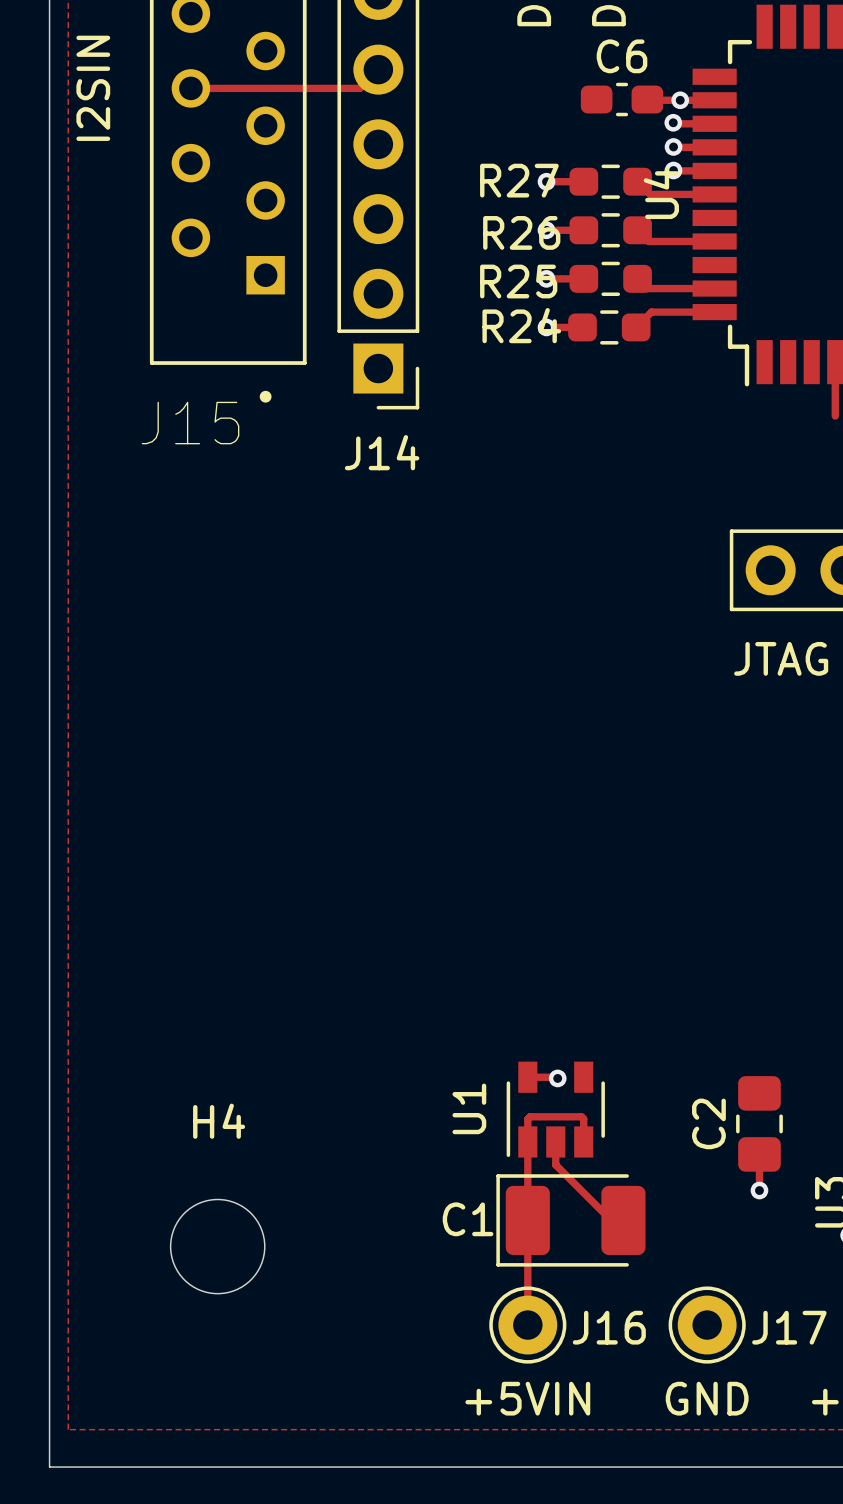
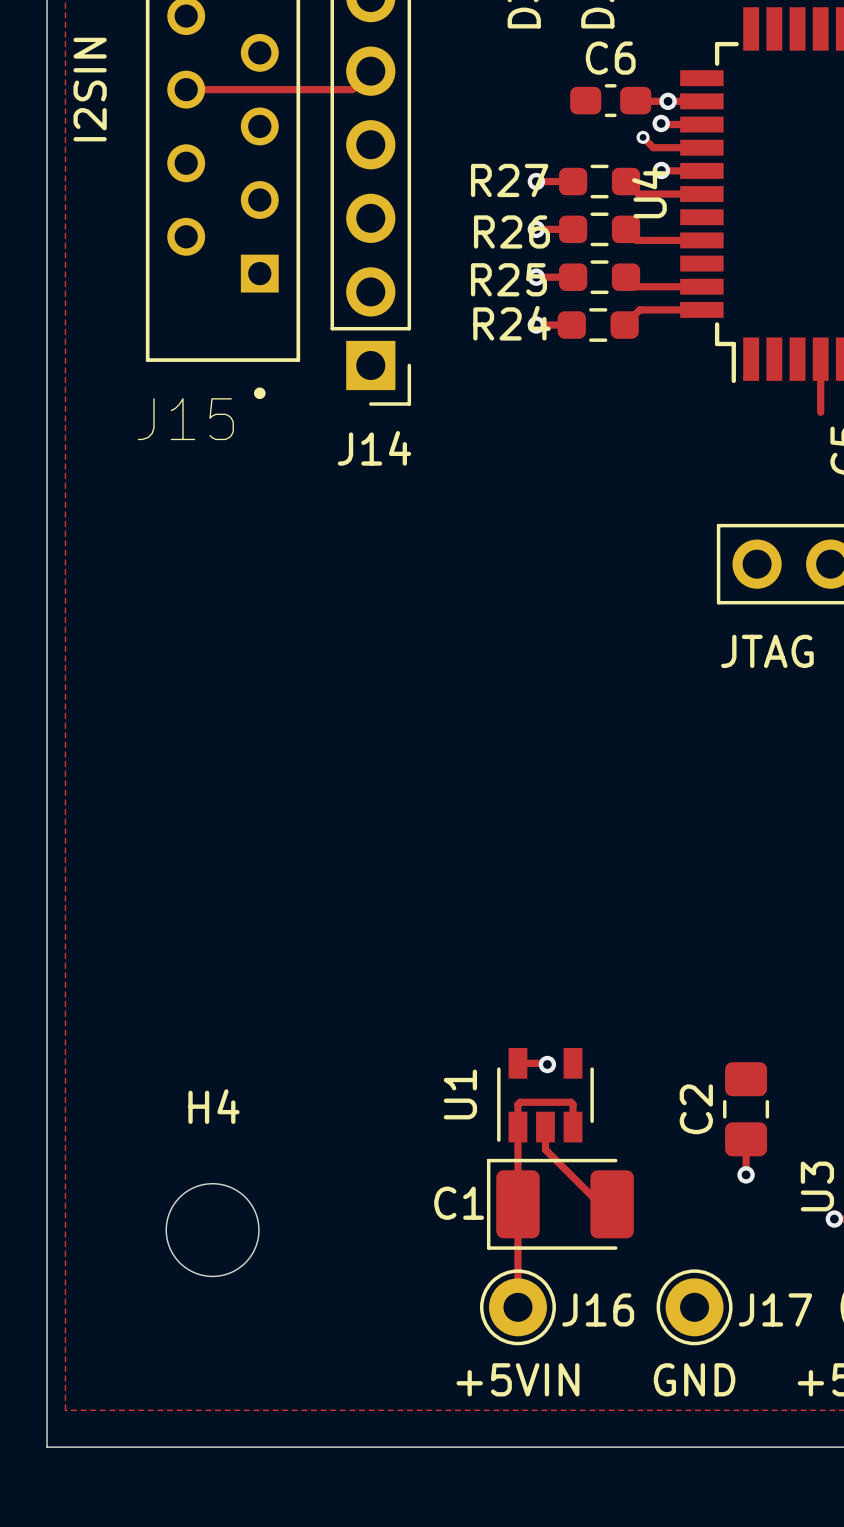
track: none -> (643, 137) (653, 147) (661, 147)
via: none -> (643, 137)
via: (673, 146) -> none

